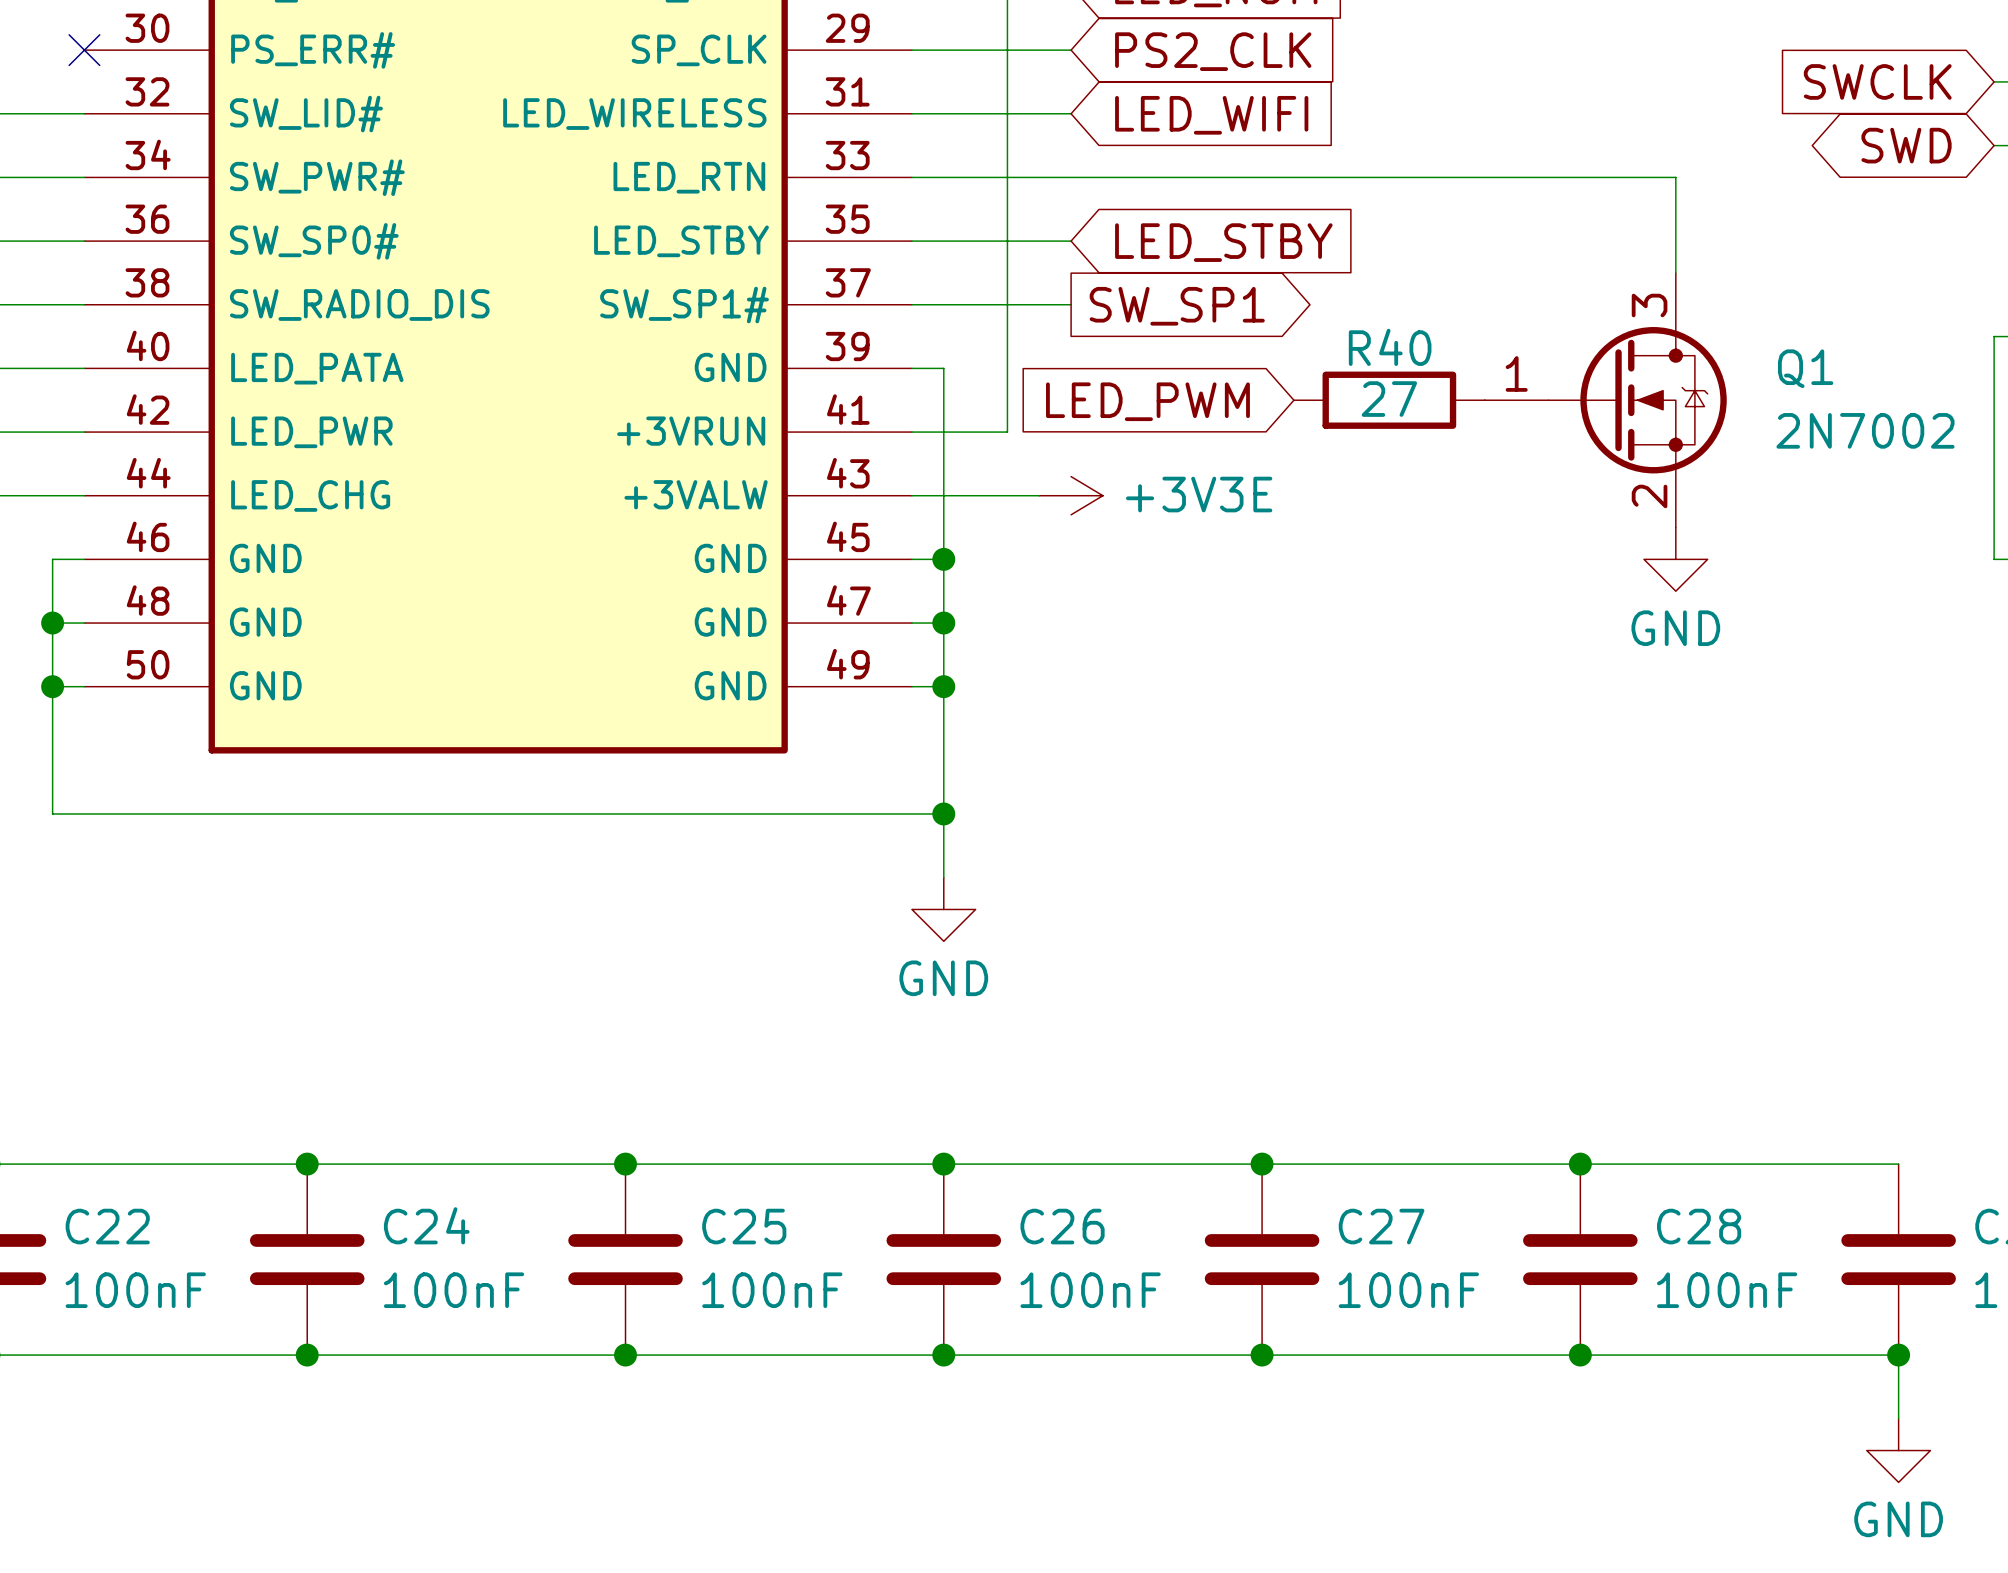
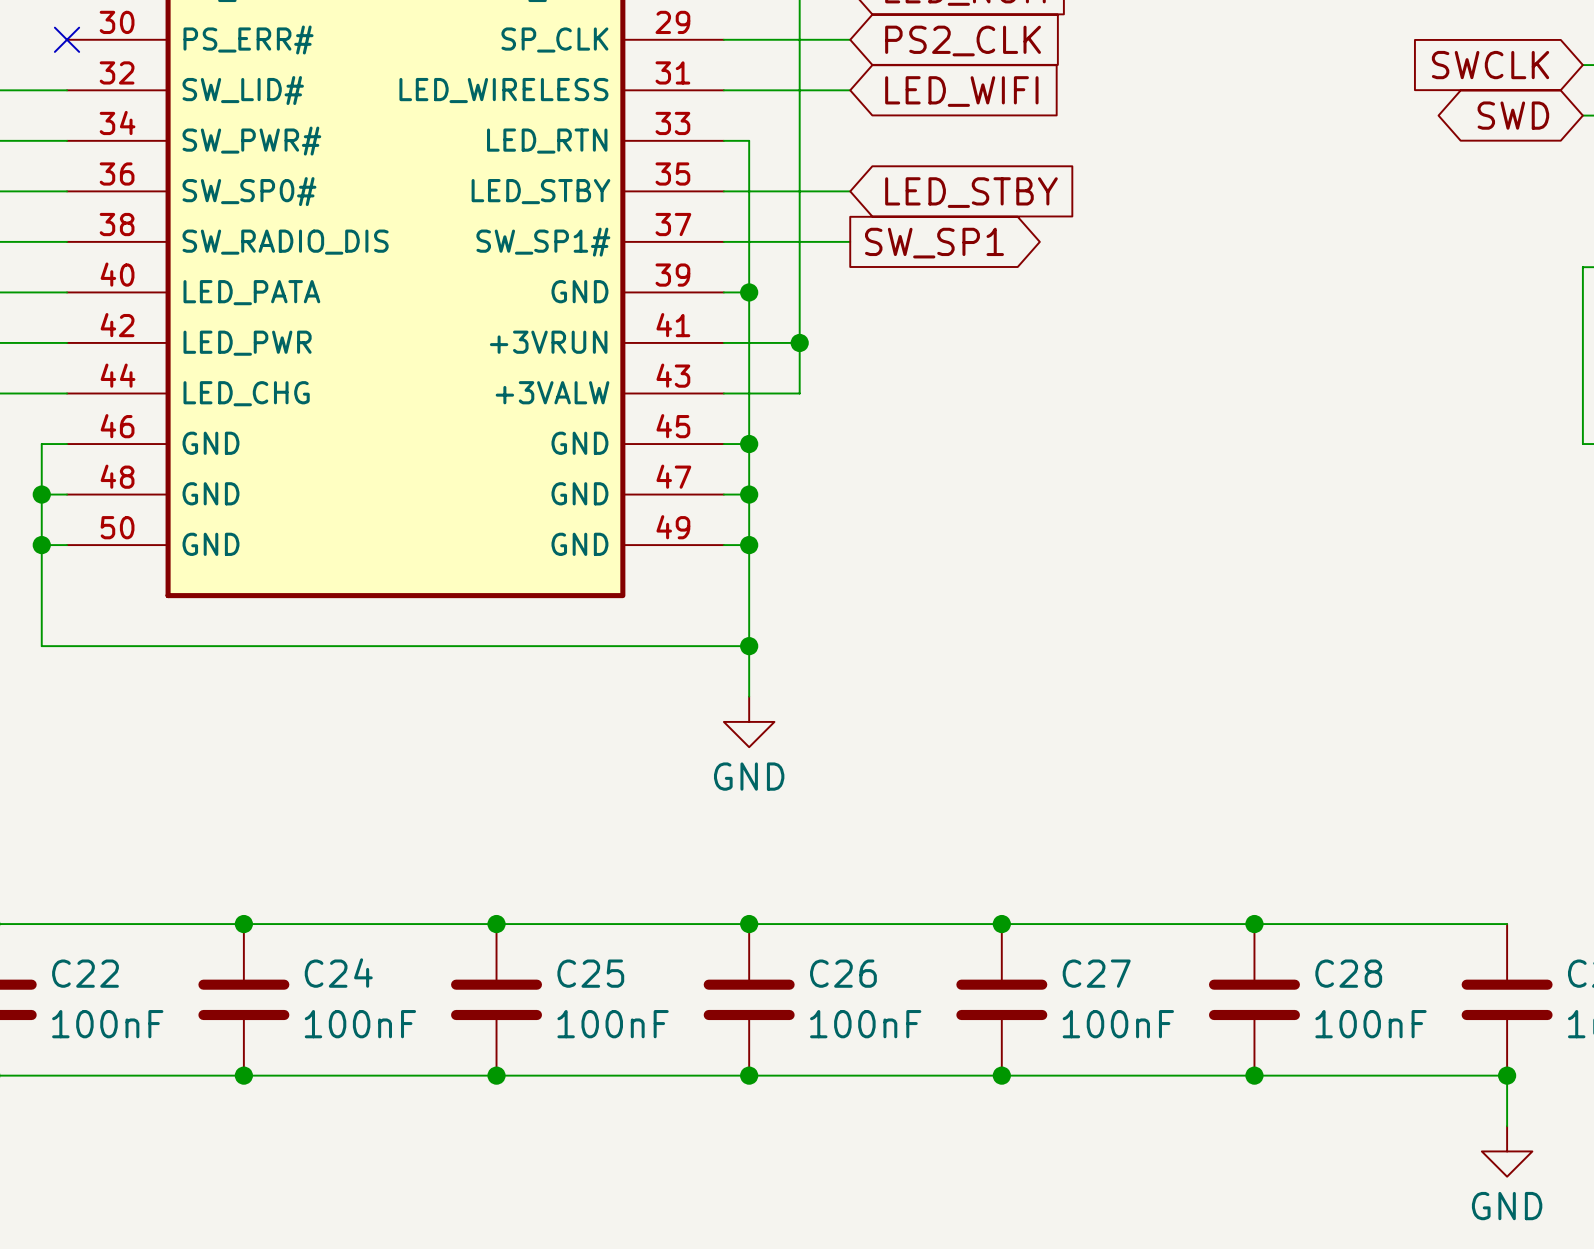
wire: (943, 177) (1675, 177) (1675, 272) -> (749, 140) (749, 292)
junction: none -> (749, 292)
R40: 27 (1389, 400) -> none
Q1: 2N7002 (1605, 400) -> none
global label: LED_PWM (1147, 401) -> none
junction: none -> (799, 342)
wire: (1007, 495) (1039, 495) -> (799, 393) (799, 342)
power symbol: +3V3E (1071, 495) -> none
power symbol: GND (1675, 559) -> none

